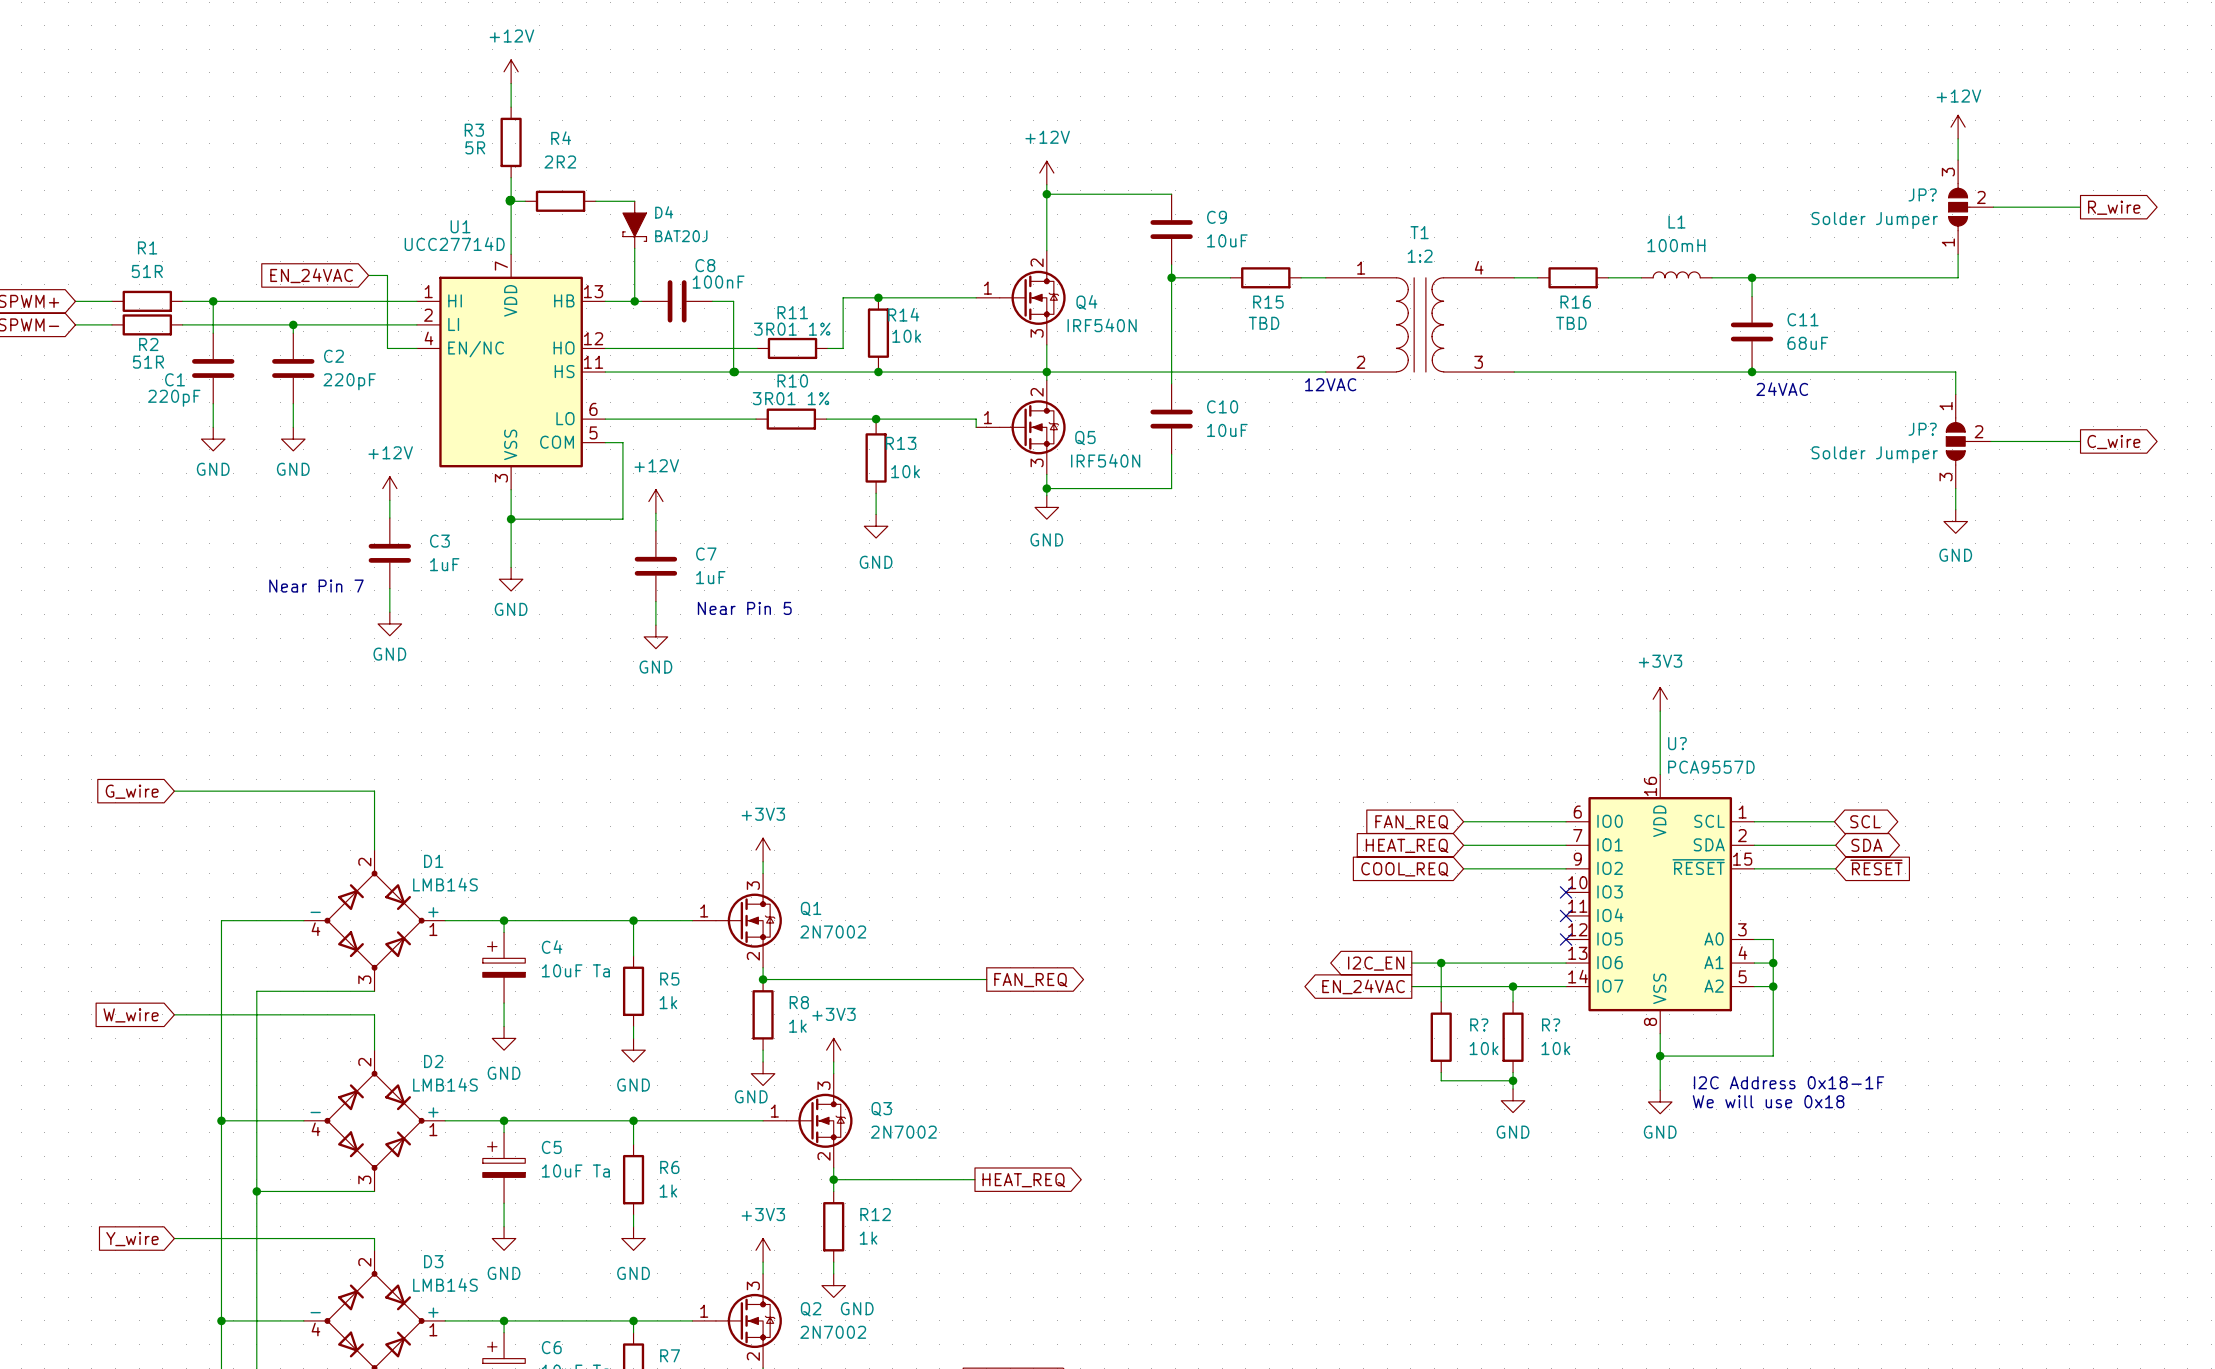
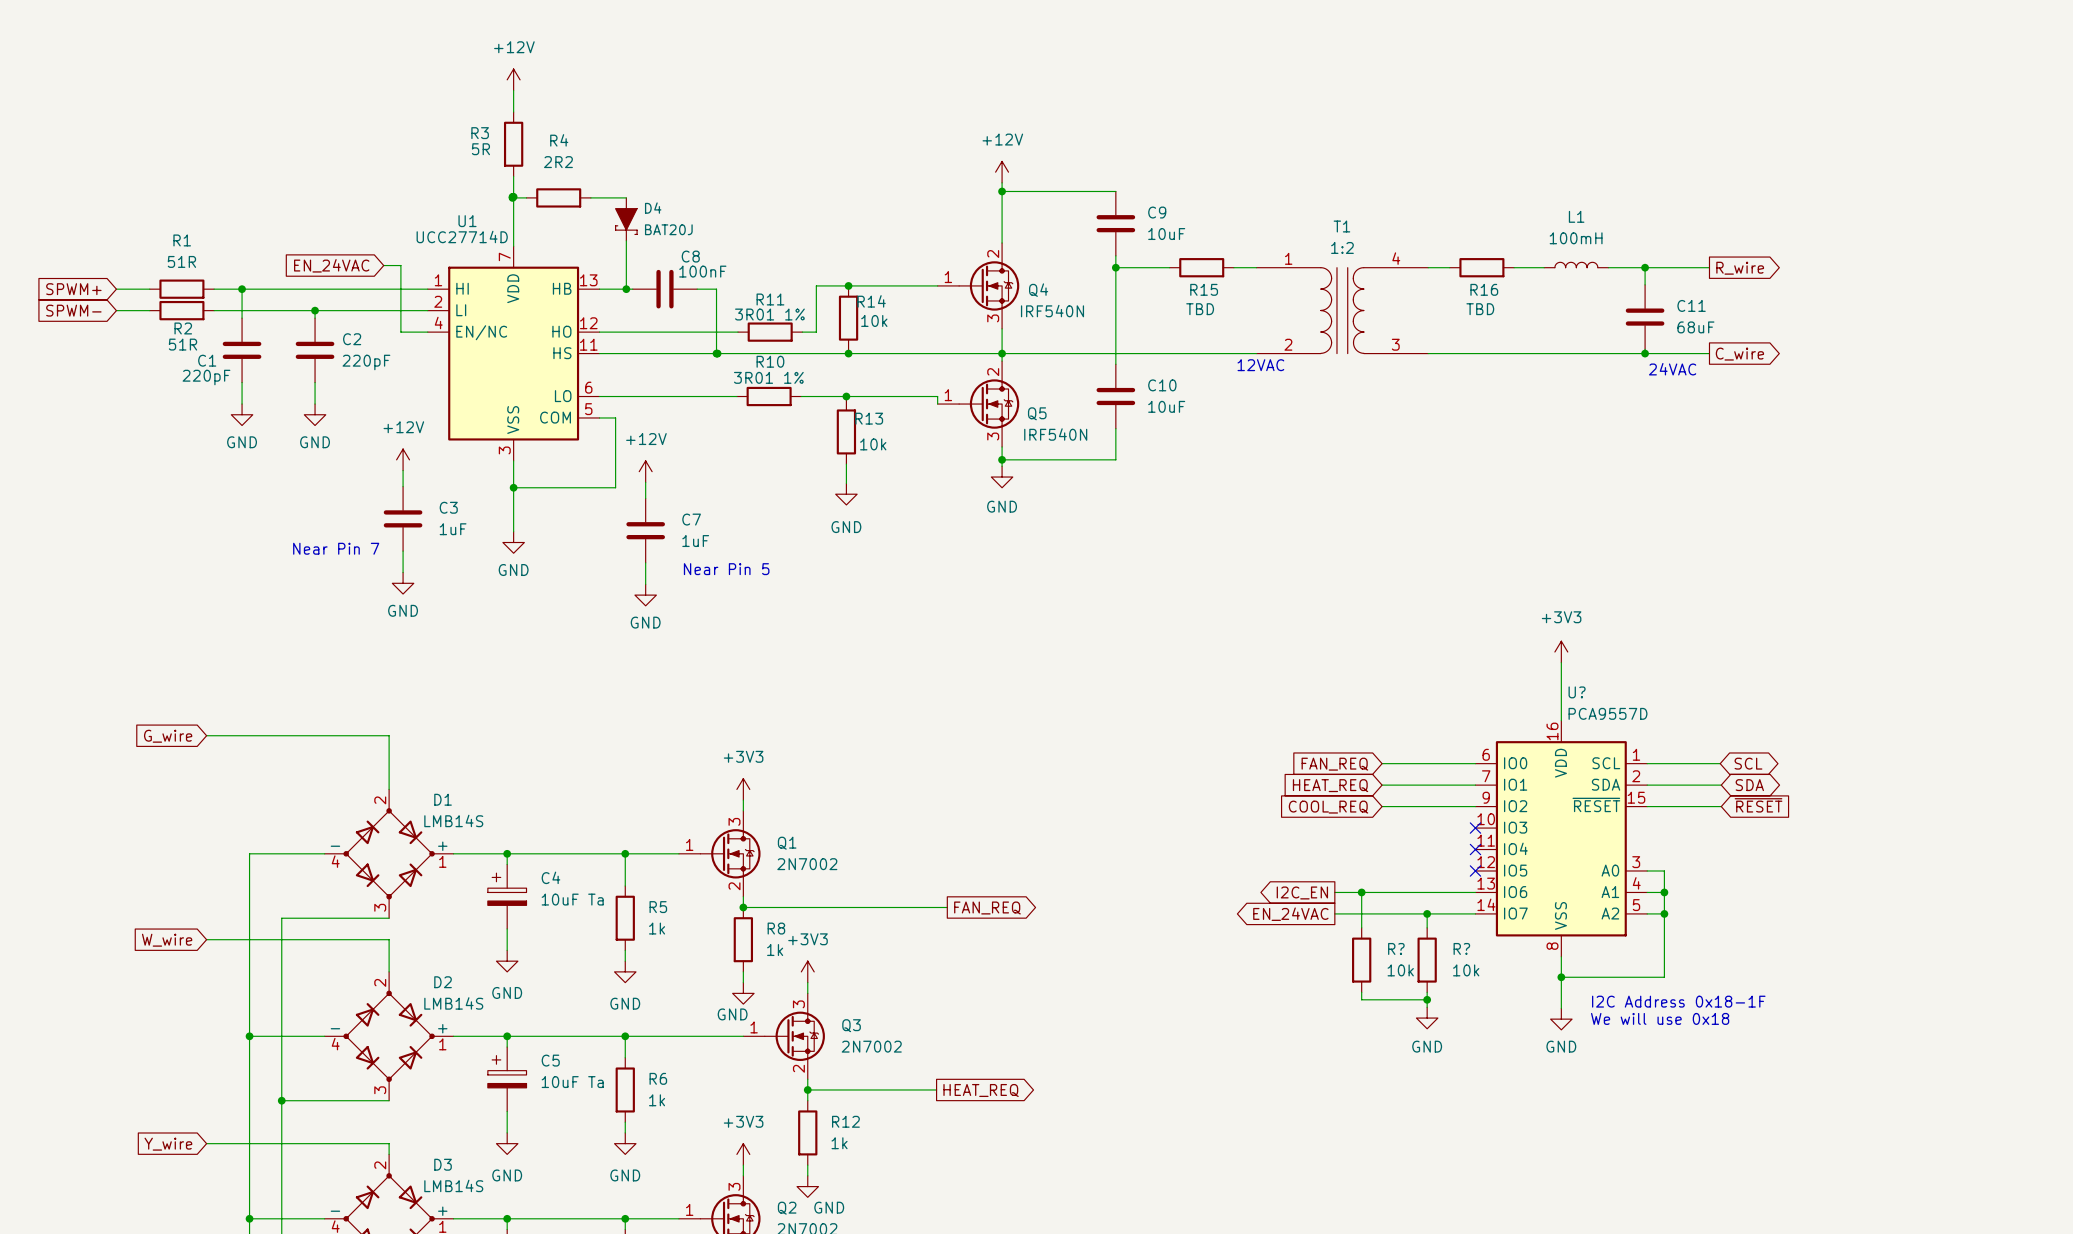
power symbol: +12V (1958, 127) -> none
wire: (1958, 138) (1958, 160) -> none
JP?: Solder Jumper (1971, 207) -> none
wire: (1993, 207) (2080, 207) -> none
global label: R_wire (2114, 207) -> none
wire: (1958, 254) (1958, 277) (1822, 277) -> none
global label: none -> R_wire (1740, 268)
wire: (1822, 372) (1955, 372) (1955, 394) -> none
global label: none -> C_wire (1739, 354)
JP?: Solder Jumper (1968, 441) -> none
wire: (1991, 441) (2080, 441) -> none
global label: C_wire (2113, 442) -> none
wire: (1955, 488) (1955, 509) -> none
power symbol: GND (1955, 521) -> none

